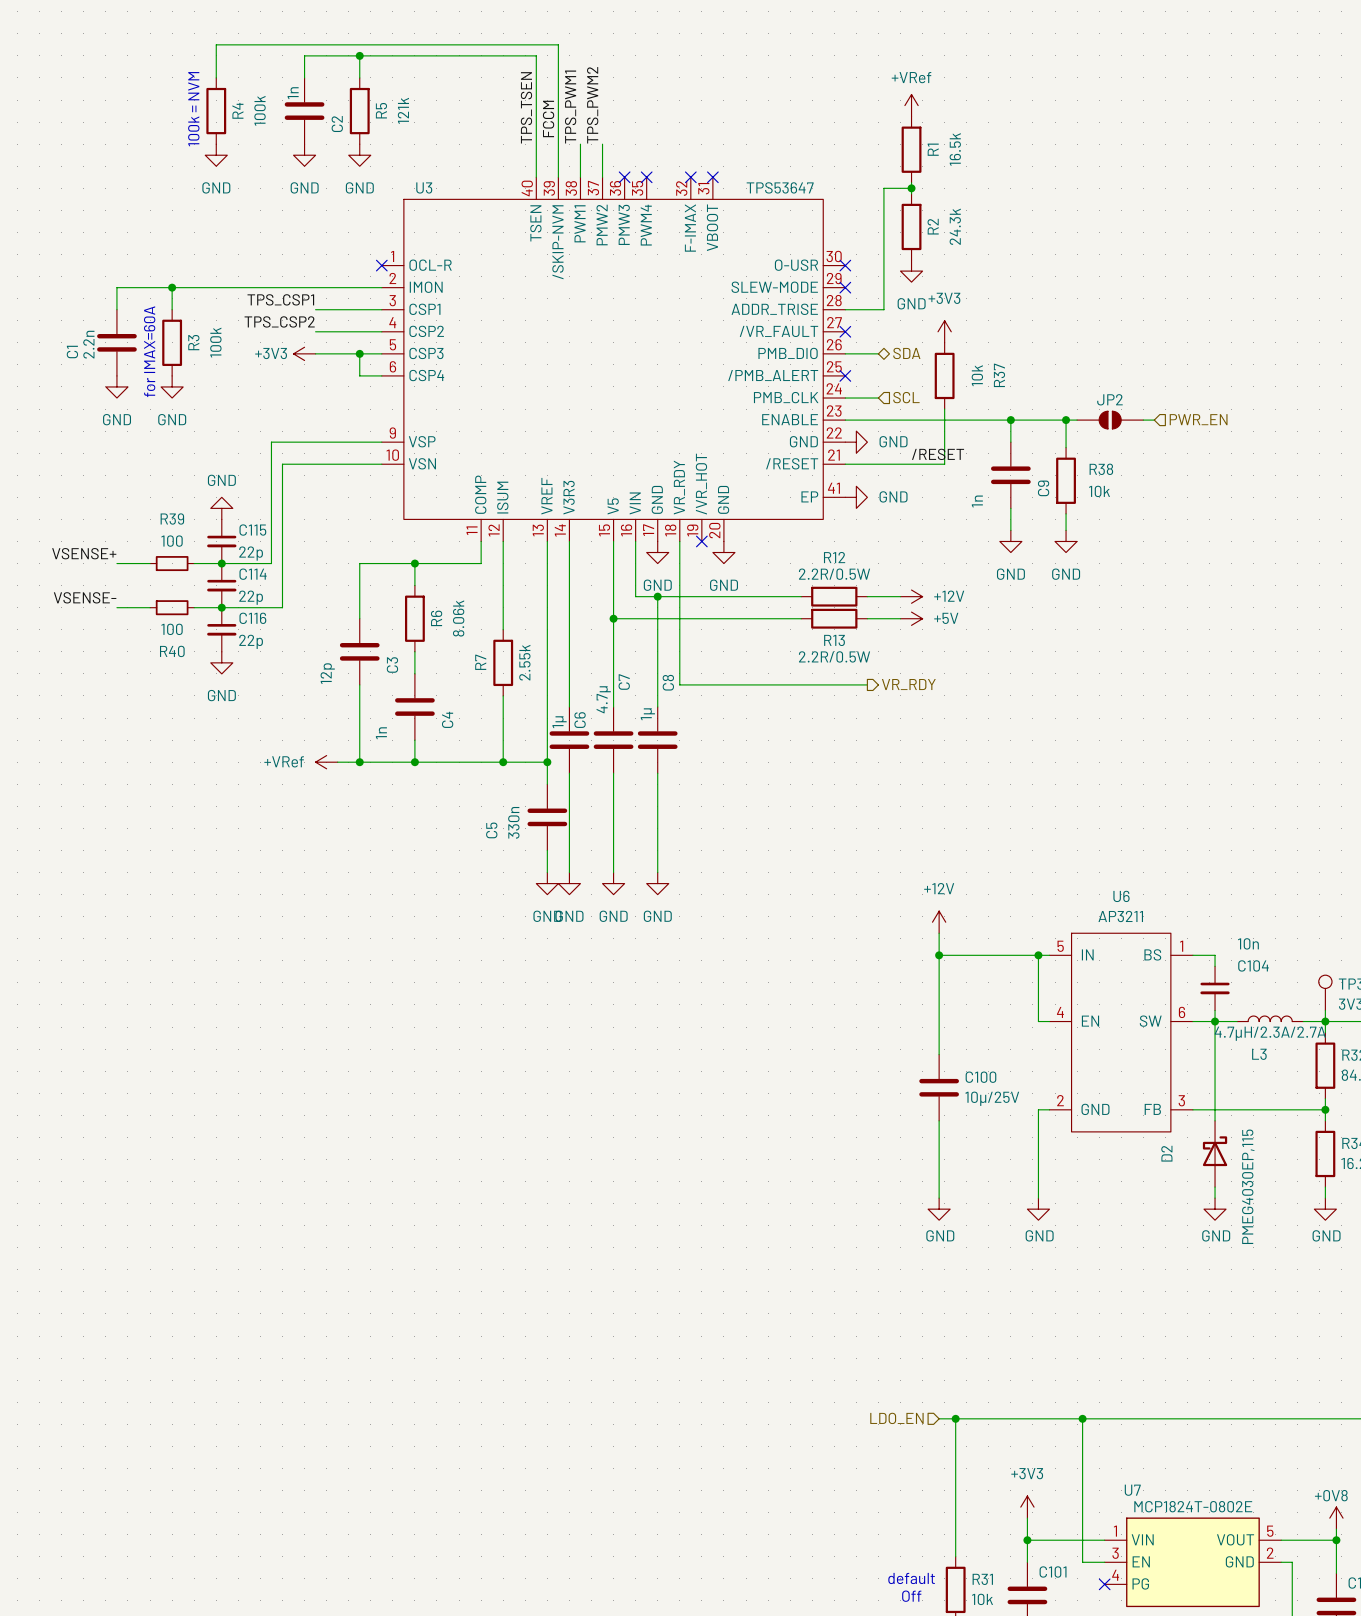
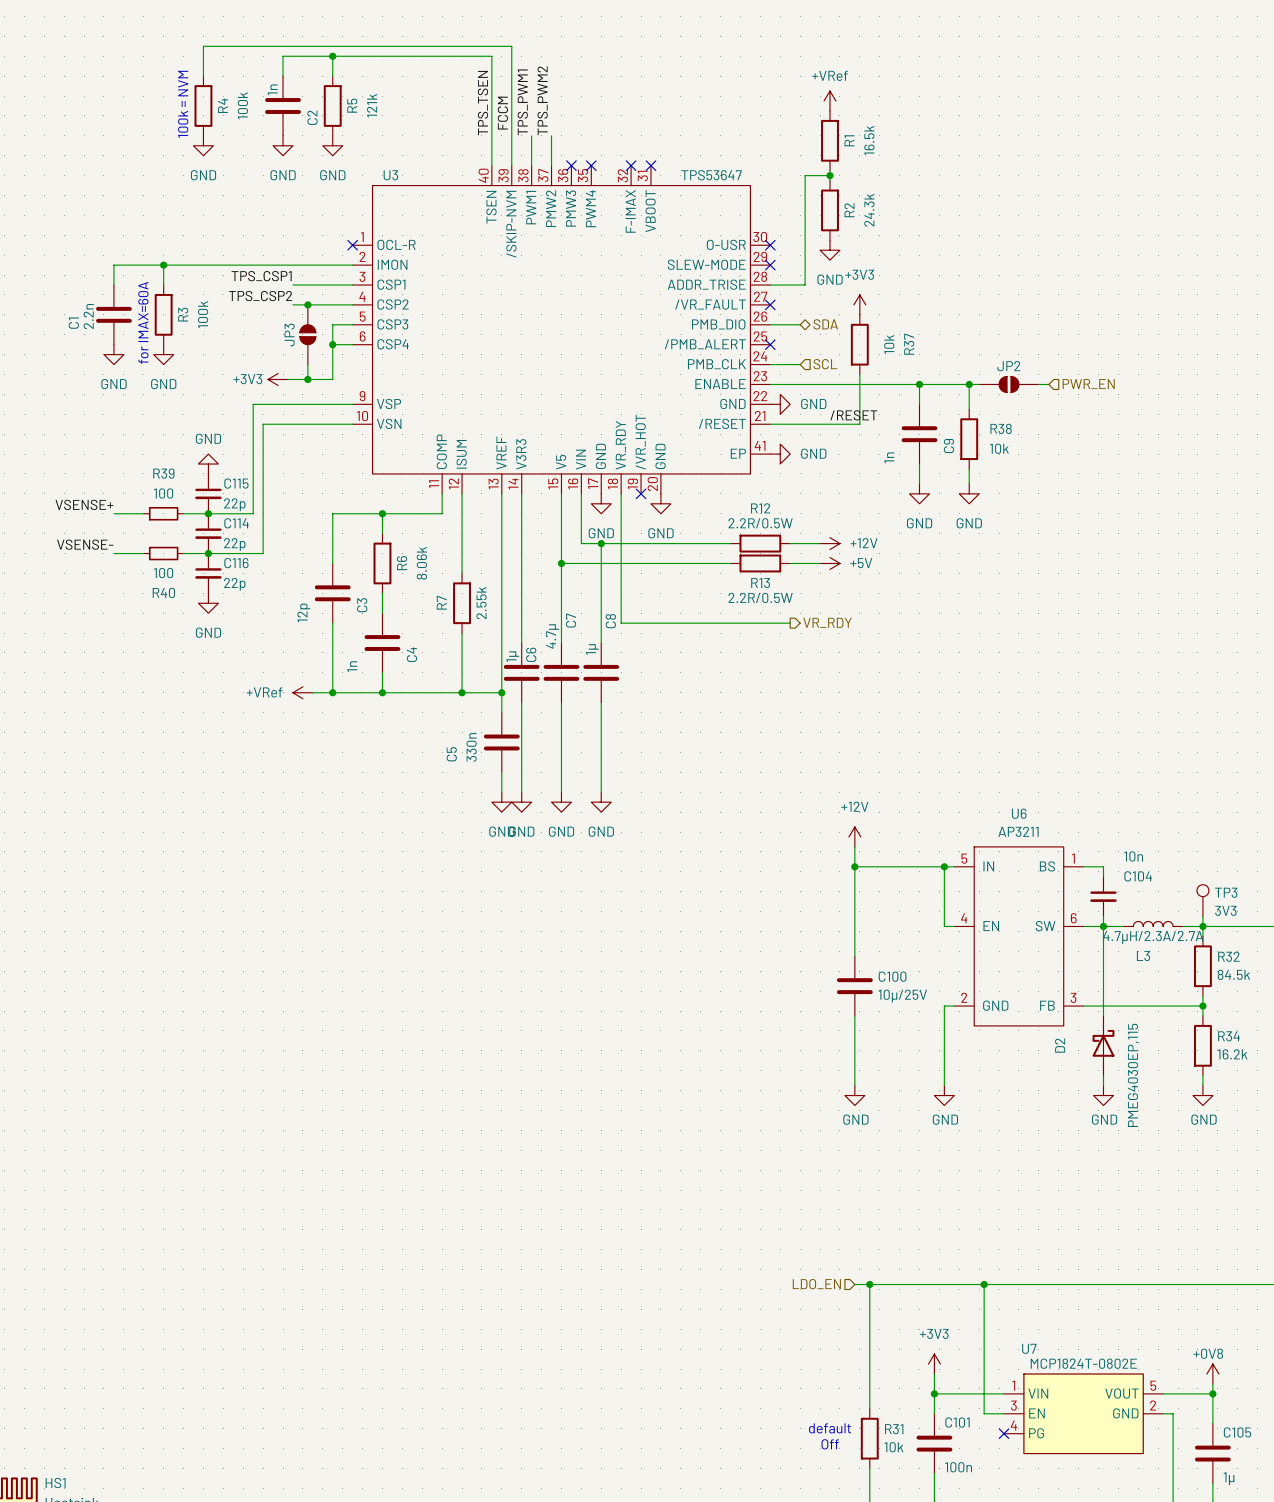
junction: none -> (307, 304)
power symbol position: +3V3 (304, 353) -> +3V3 (278, 379)
wire: (315, 353) (359, 353) -> none
junction: (359, 353) -> none
JP3: none -> (307, 334)
wire: none -> (332, 344) (332, 379) (287, 379)
junction: none -> (332, 344)
wire: none -> (307, 364) (307, 379)
junction: none -> (307, 379)

